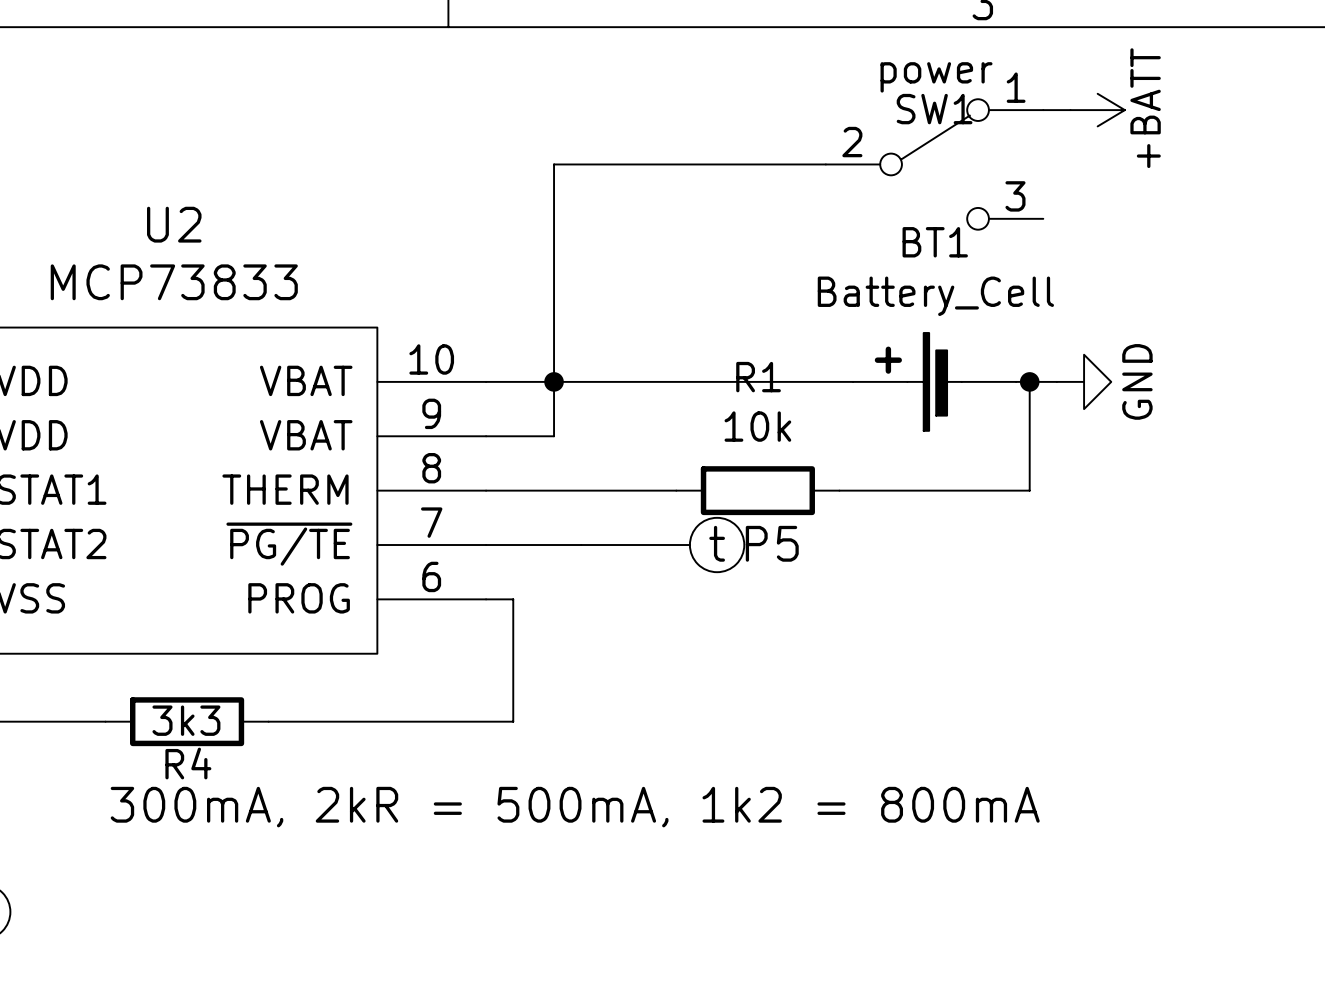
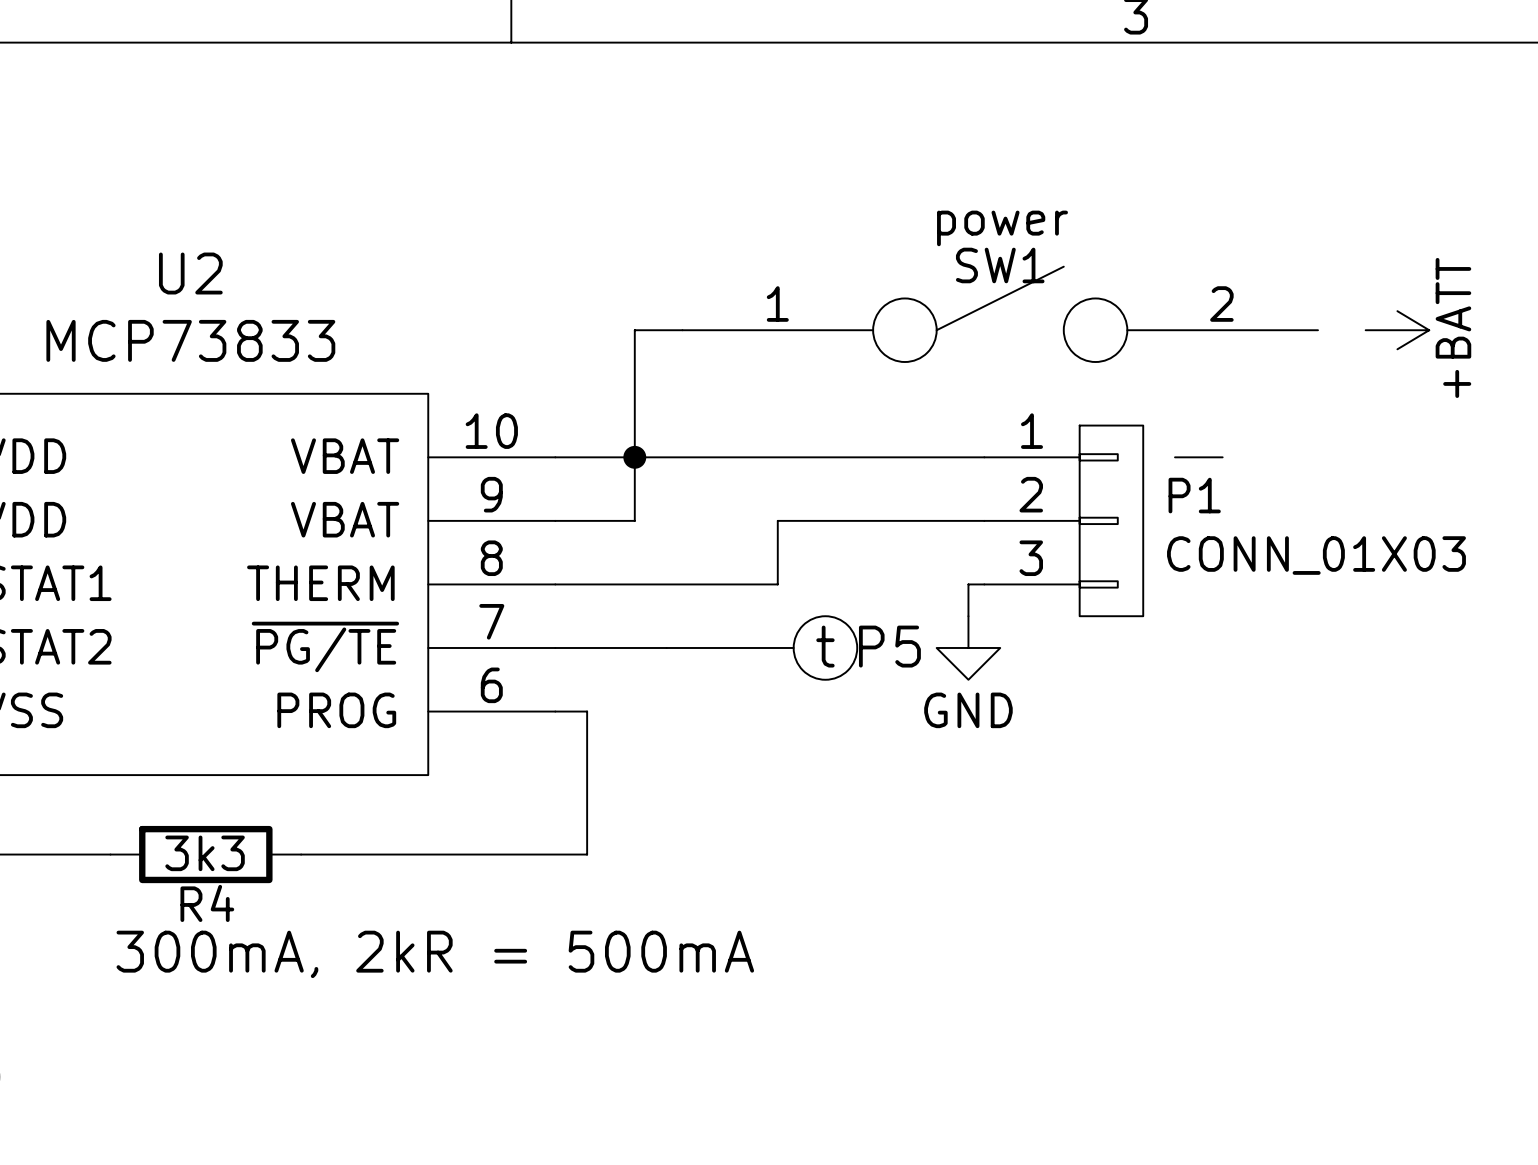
SW1 symbol: [825, 99, 1044, 230] -> [682, 266, 1318, 363]
wire: (1043, 110) (1070, 110) -> none
power symbol position: +BATT (1097, 110) -> +BATT (1397, 330)
wire: (825, 164) (554, 164) (554, 273) -> (682, 330) (634, 330)
BT1: Battery_Cell (934, 381) -> none
wire: (1029, 381) (1029, 490) (853, 490) -> none
junction: (1029, 381) -> none
power symbol rotation: 0° (1084, 381) -> 90° clockwise (968, 647)
power symbol position: GND (1084, 381) -> GND (968, 647)
wire: none -> (984, 520) (777, 520) (777, 584)
P1: none -> CONN_01X03 (1063, 520)
R1: 10k (757, 490) -> none
wire: none -> (968, 584) (968, 616)
text: 300mA, 2kR = 500mA, 1k2 = 800mA (575, 807) -> 300mA, 2kR = 500mA (435, 954)

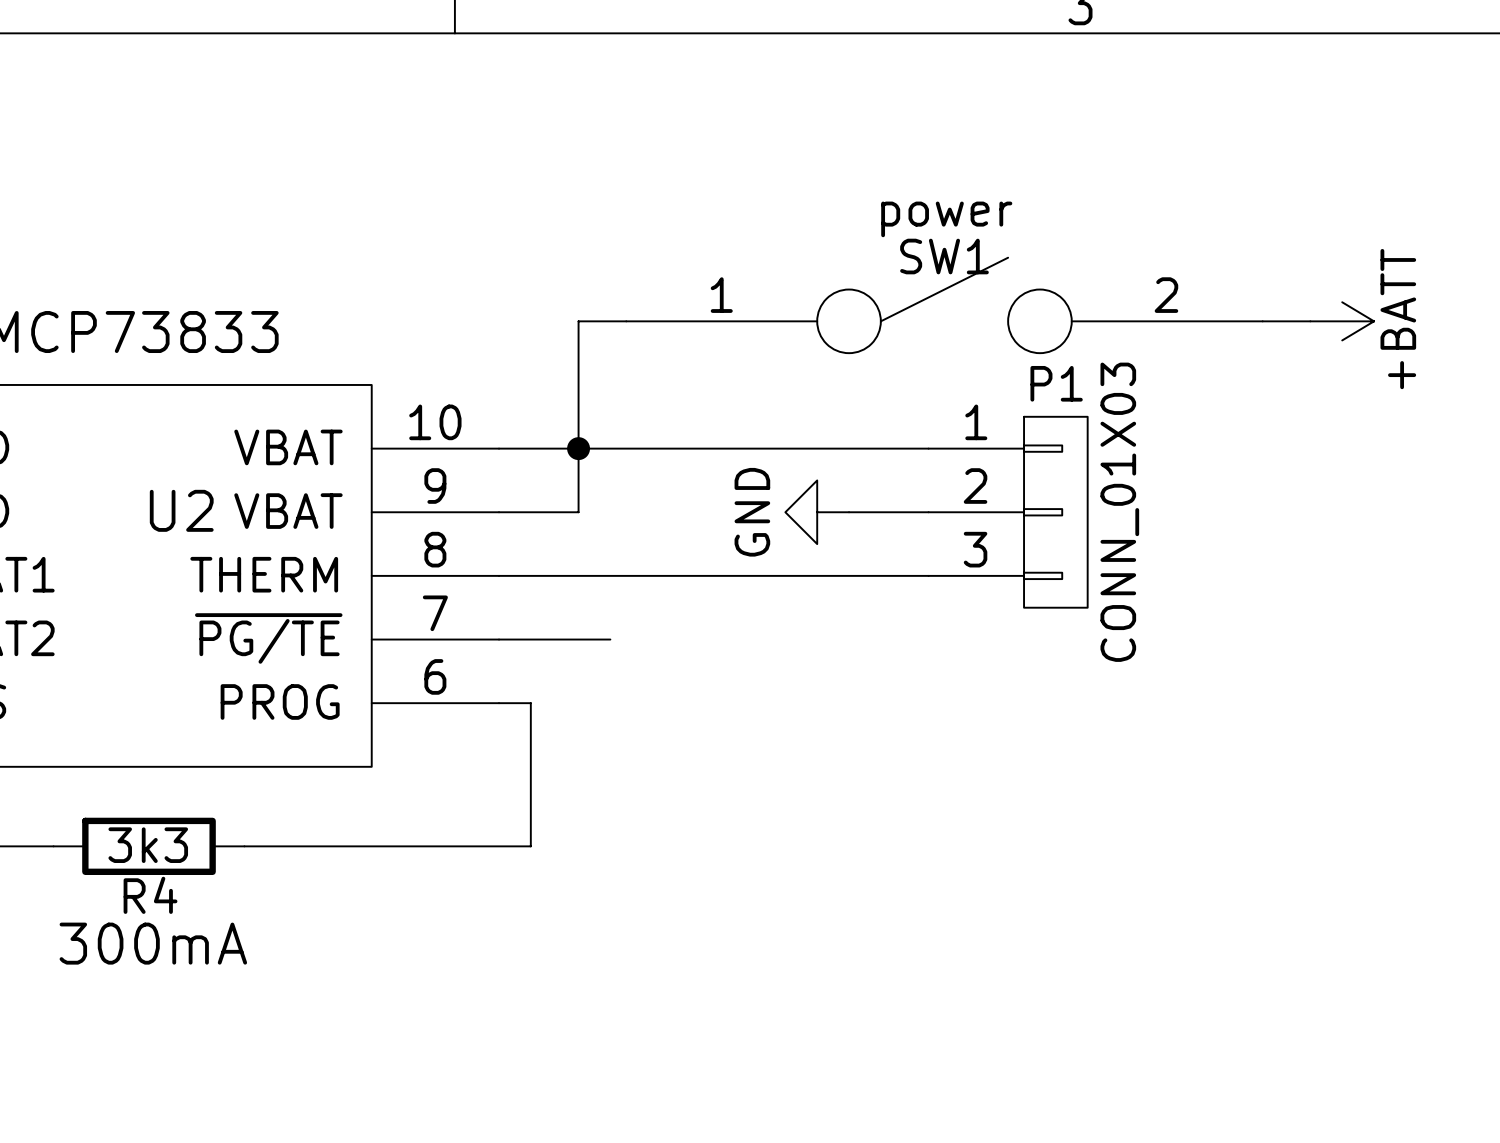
U2 name position: U2 (190, 273) -> U2 (181, 510)
wire: (1175, 457) (1222, 457) -> (1262, 321) (1310, 321)
P1 name position: P1 (1194, 495) -> P1 (1056, 383)
wire: (904, 520) (777, 520) (777, 584) -> (912, 575) (721, 575)
P1 value rotation: 0° (1316, 555) -> 90° counterclockwise (1119, 512)
wire: (968, 584) (968, 616) -> none
P5: (761, 647) -> none
power symbol rotation: 0° (968, 647) -> 90° clockwise (817, 512)
power symbol position: GND (968, 647) -> GND (817, 512)
text: 300mA, 2kR = 500mA (435, 954) -> 300mA (153, 943)

